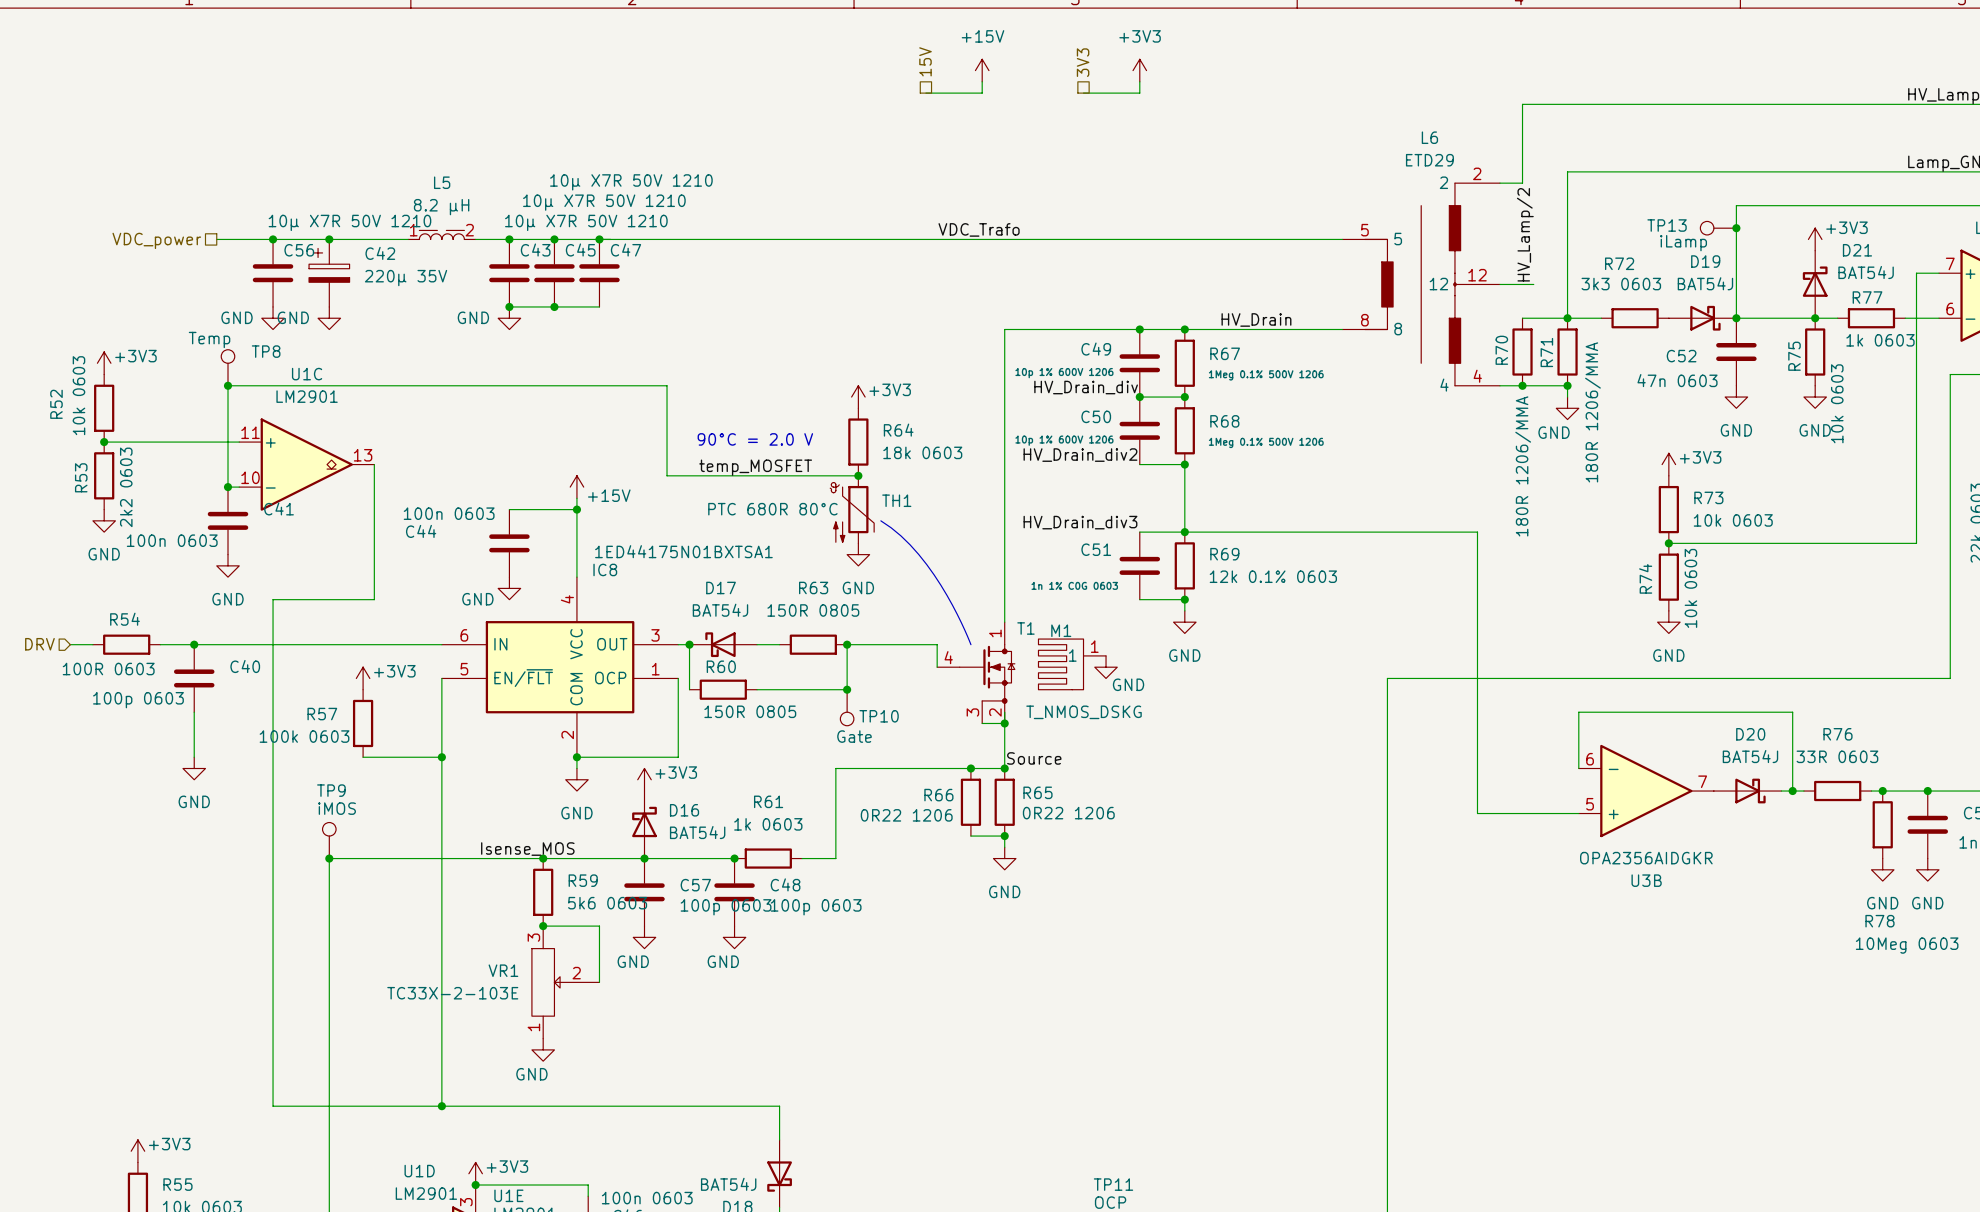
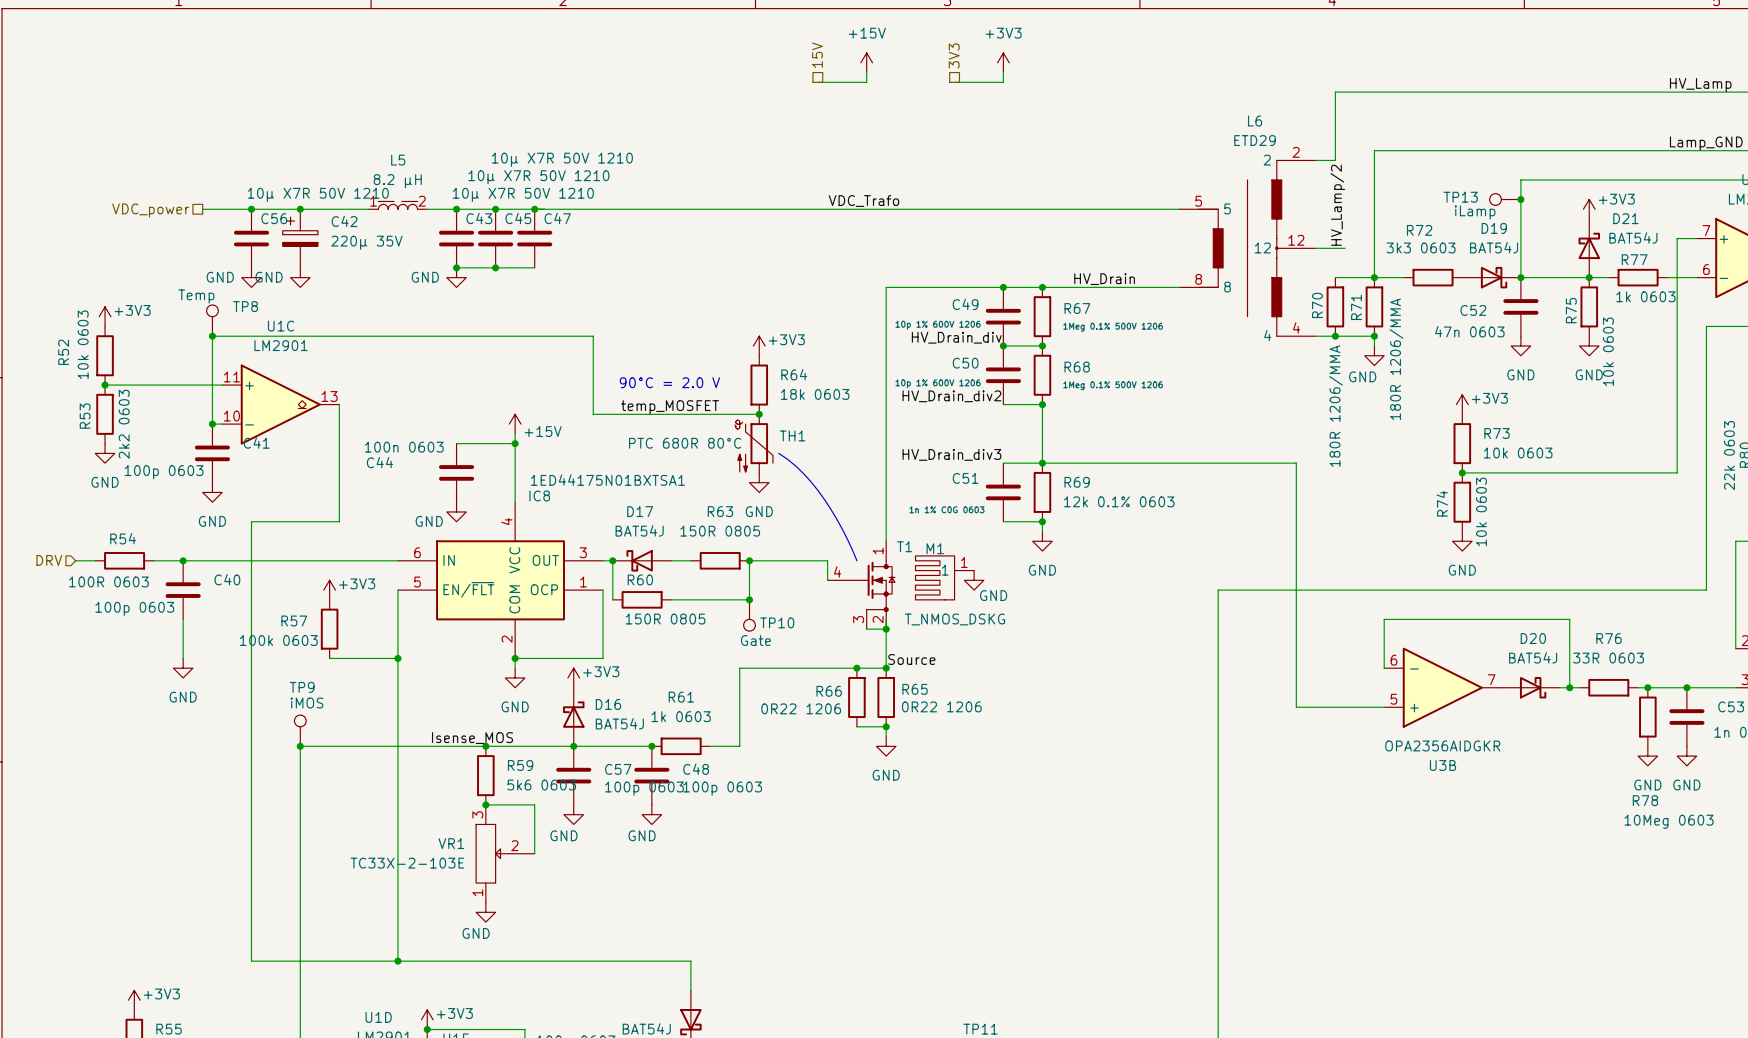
C41 value: 100n 0603 (172, 540) -> 100p 0603 (164, 472)

